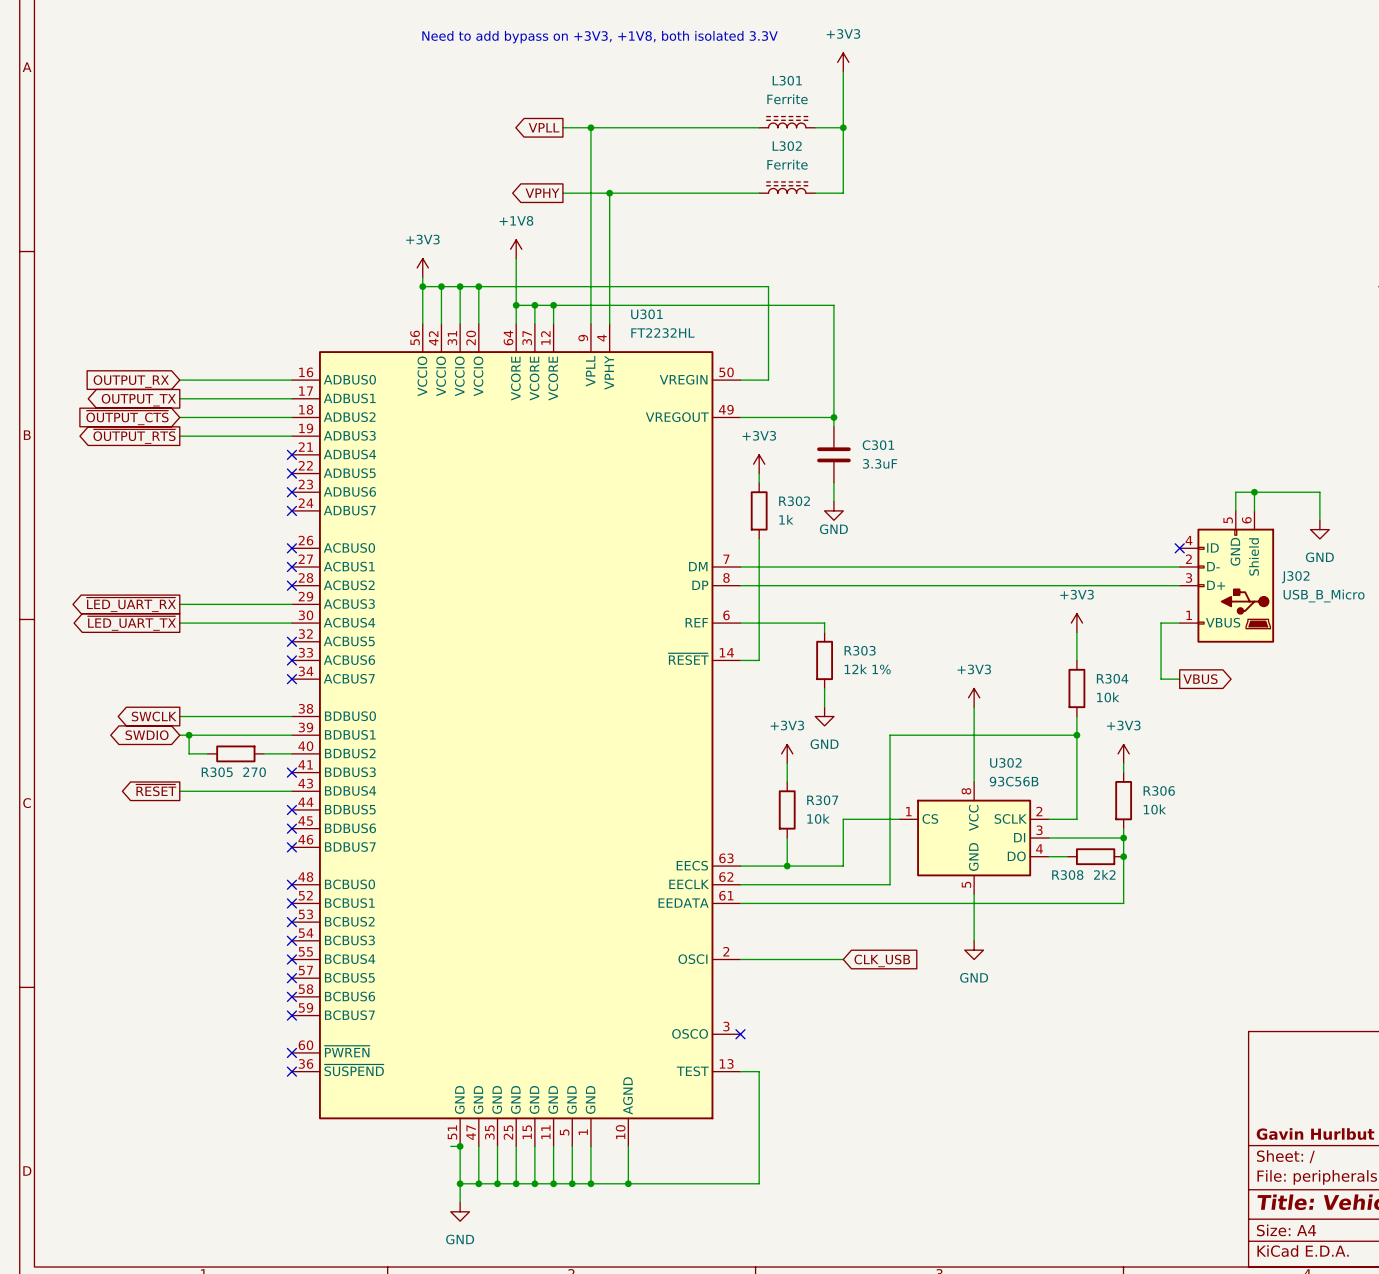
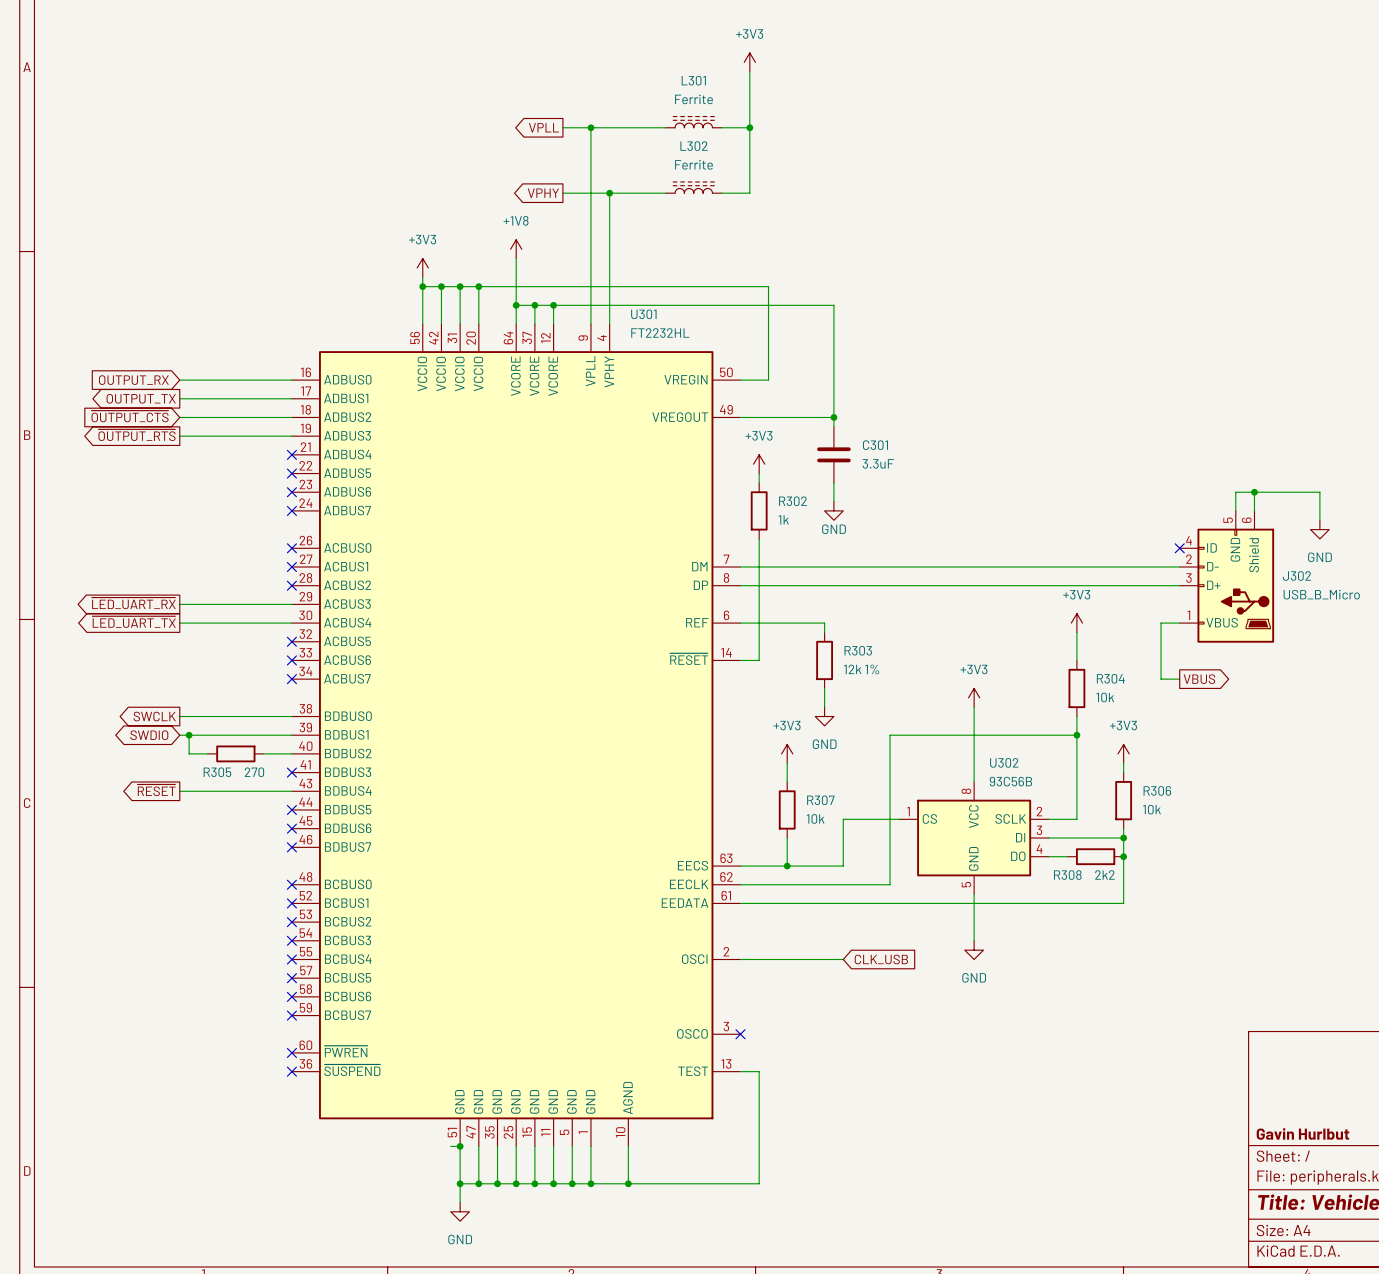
text: Need to add bypass on +3V3, +1V8, both isolated 3.3V (600, 37) -> none
power symbol position: +3V3 (843, 62) -> +3V3 (749, 62)
wire: (843, 71) (843, 193) (815, 193) -> none
L301 position: (787, 122) -> (693, 122)
wire: (665, 127) (721, 127) -> none
wire: (749, 127) (759, 127) -> none
junction: none -> (749, 127)
wire: (815, 127) (843, 127) -> none
junction: (843, 127) -> none
L302 position: (787, 187) -> (693, 187)
wire: (665, 193) (721, 193) -> none
wire: (749, 193) (759, 193) -> (749, 193) (749, 71)

